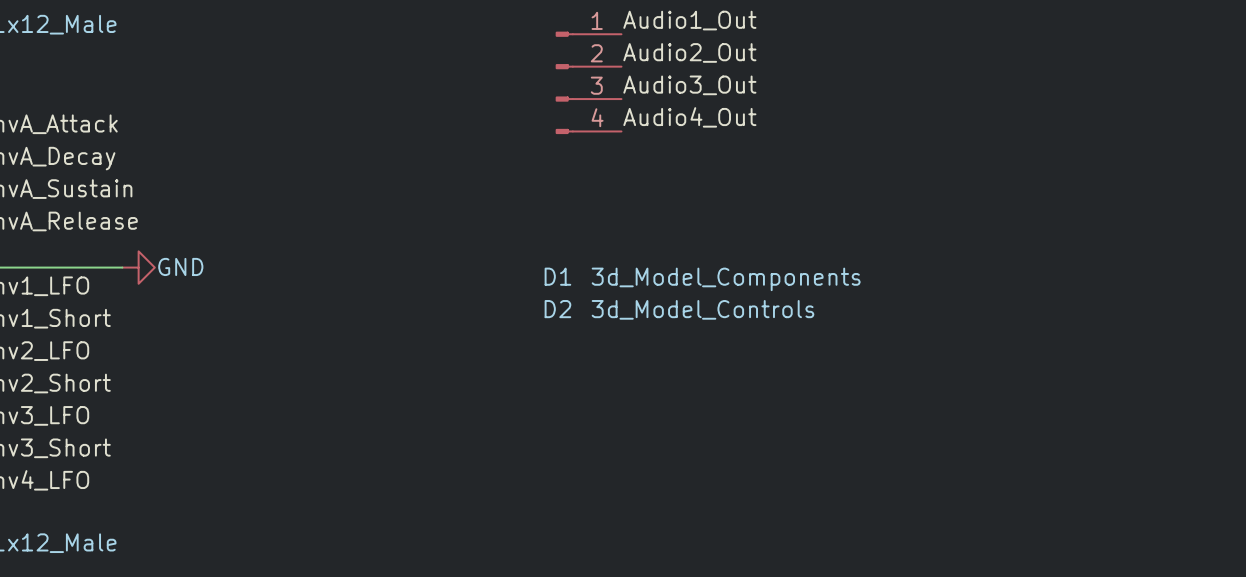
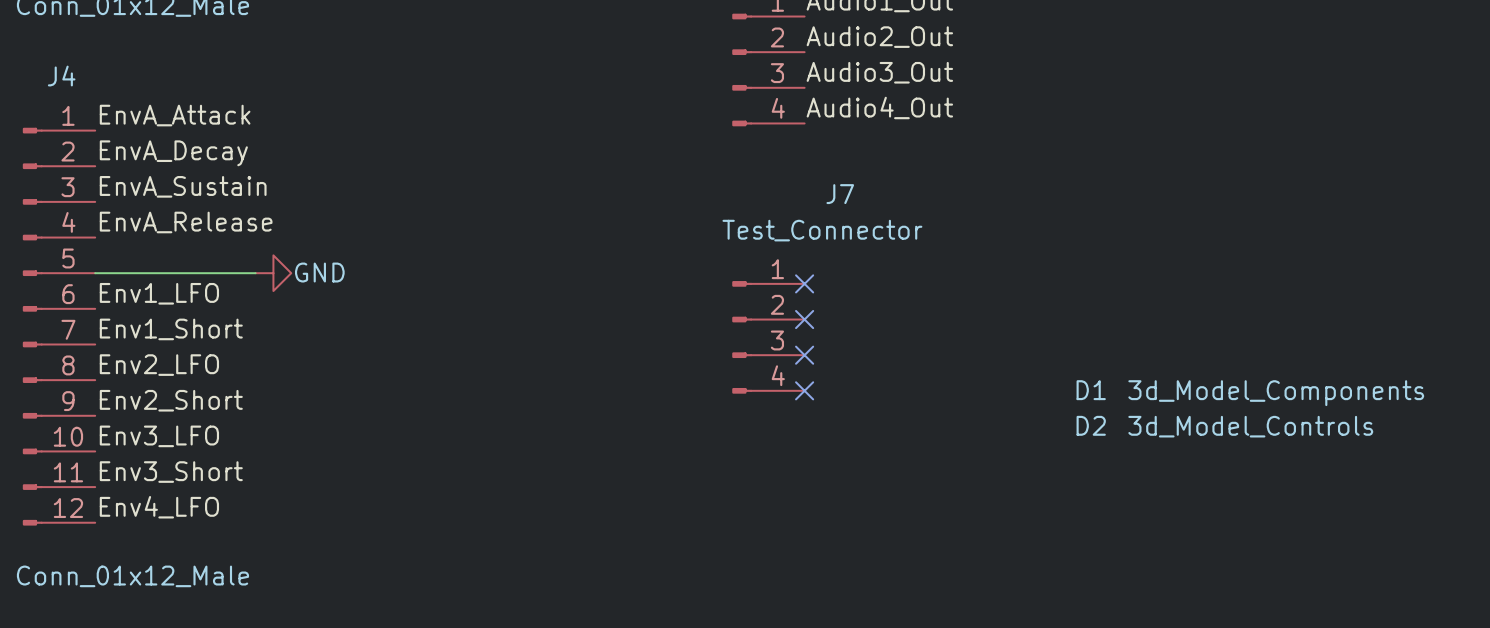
no-connect mark: none -> (804, 283)
D1 position: (702, 279) -> (1250, 393)
no-connect mark: none -> (804, 319)
D2 position: (679, 309) -> (1224, 426)
J7: none -> Test_Connector (768, 337)
no-connect mark: none -> (804, 355)
no-connect mark: none -> (804, 390)

